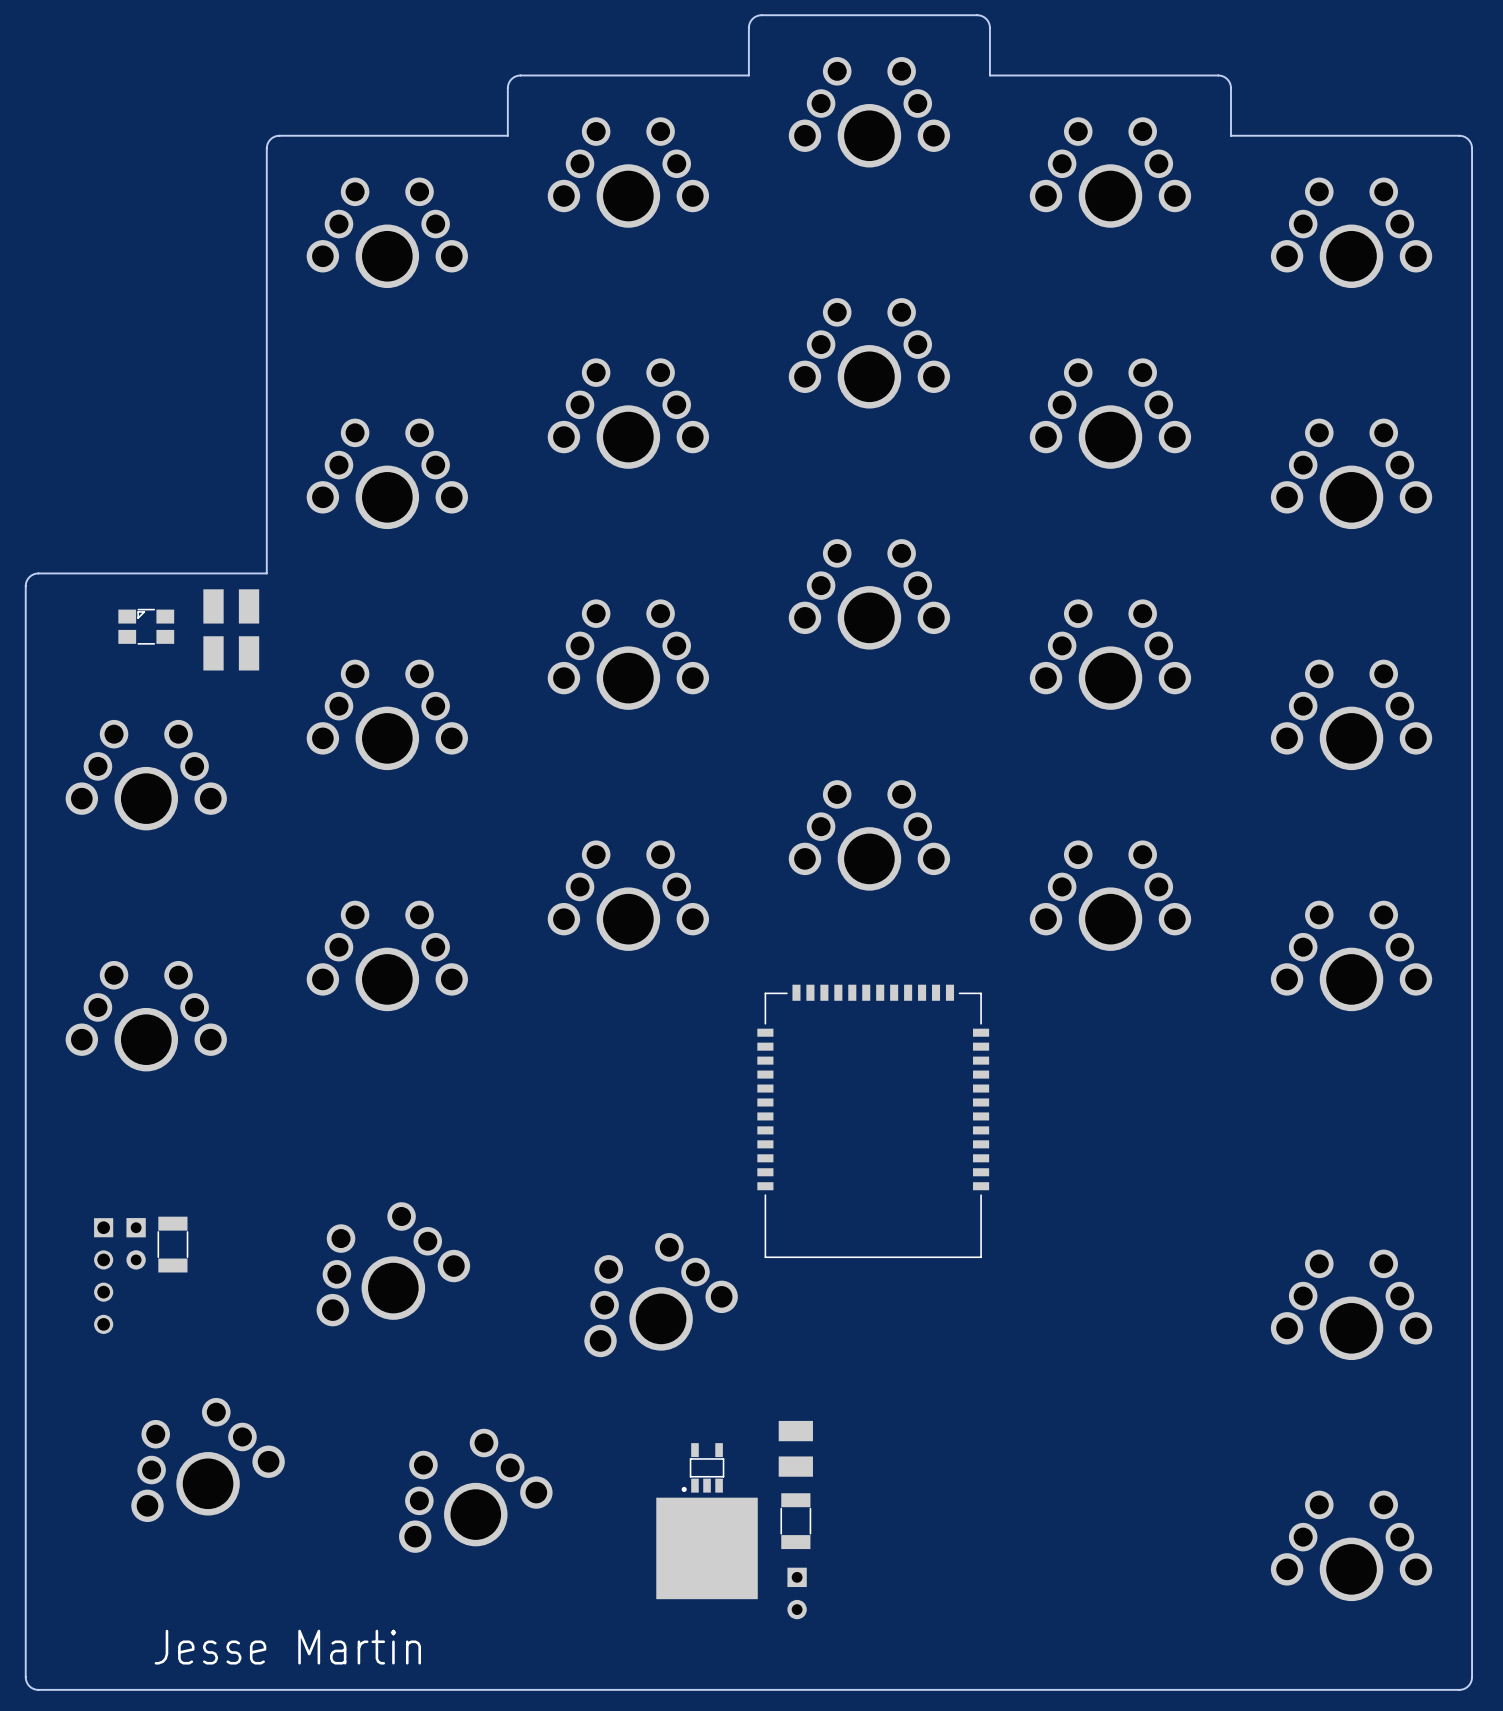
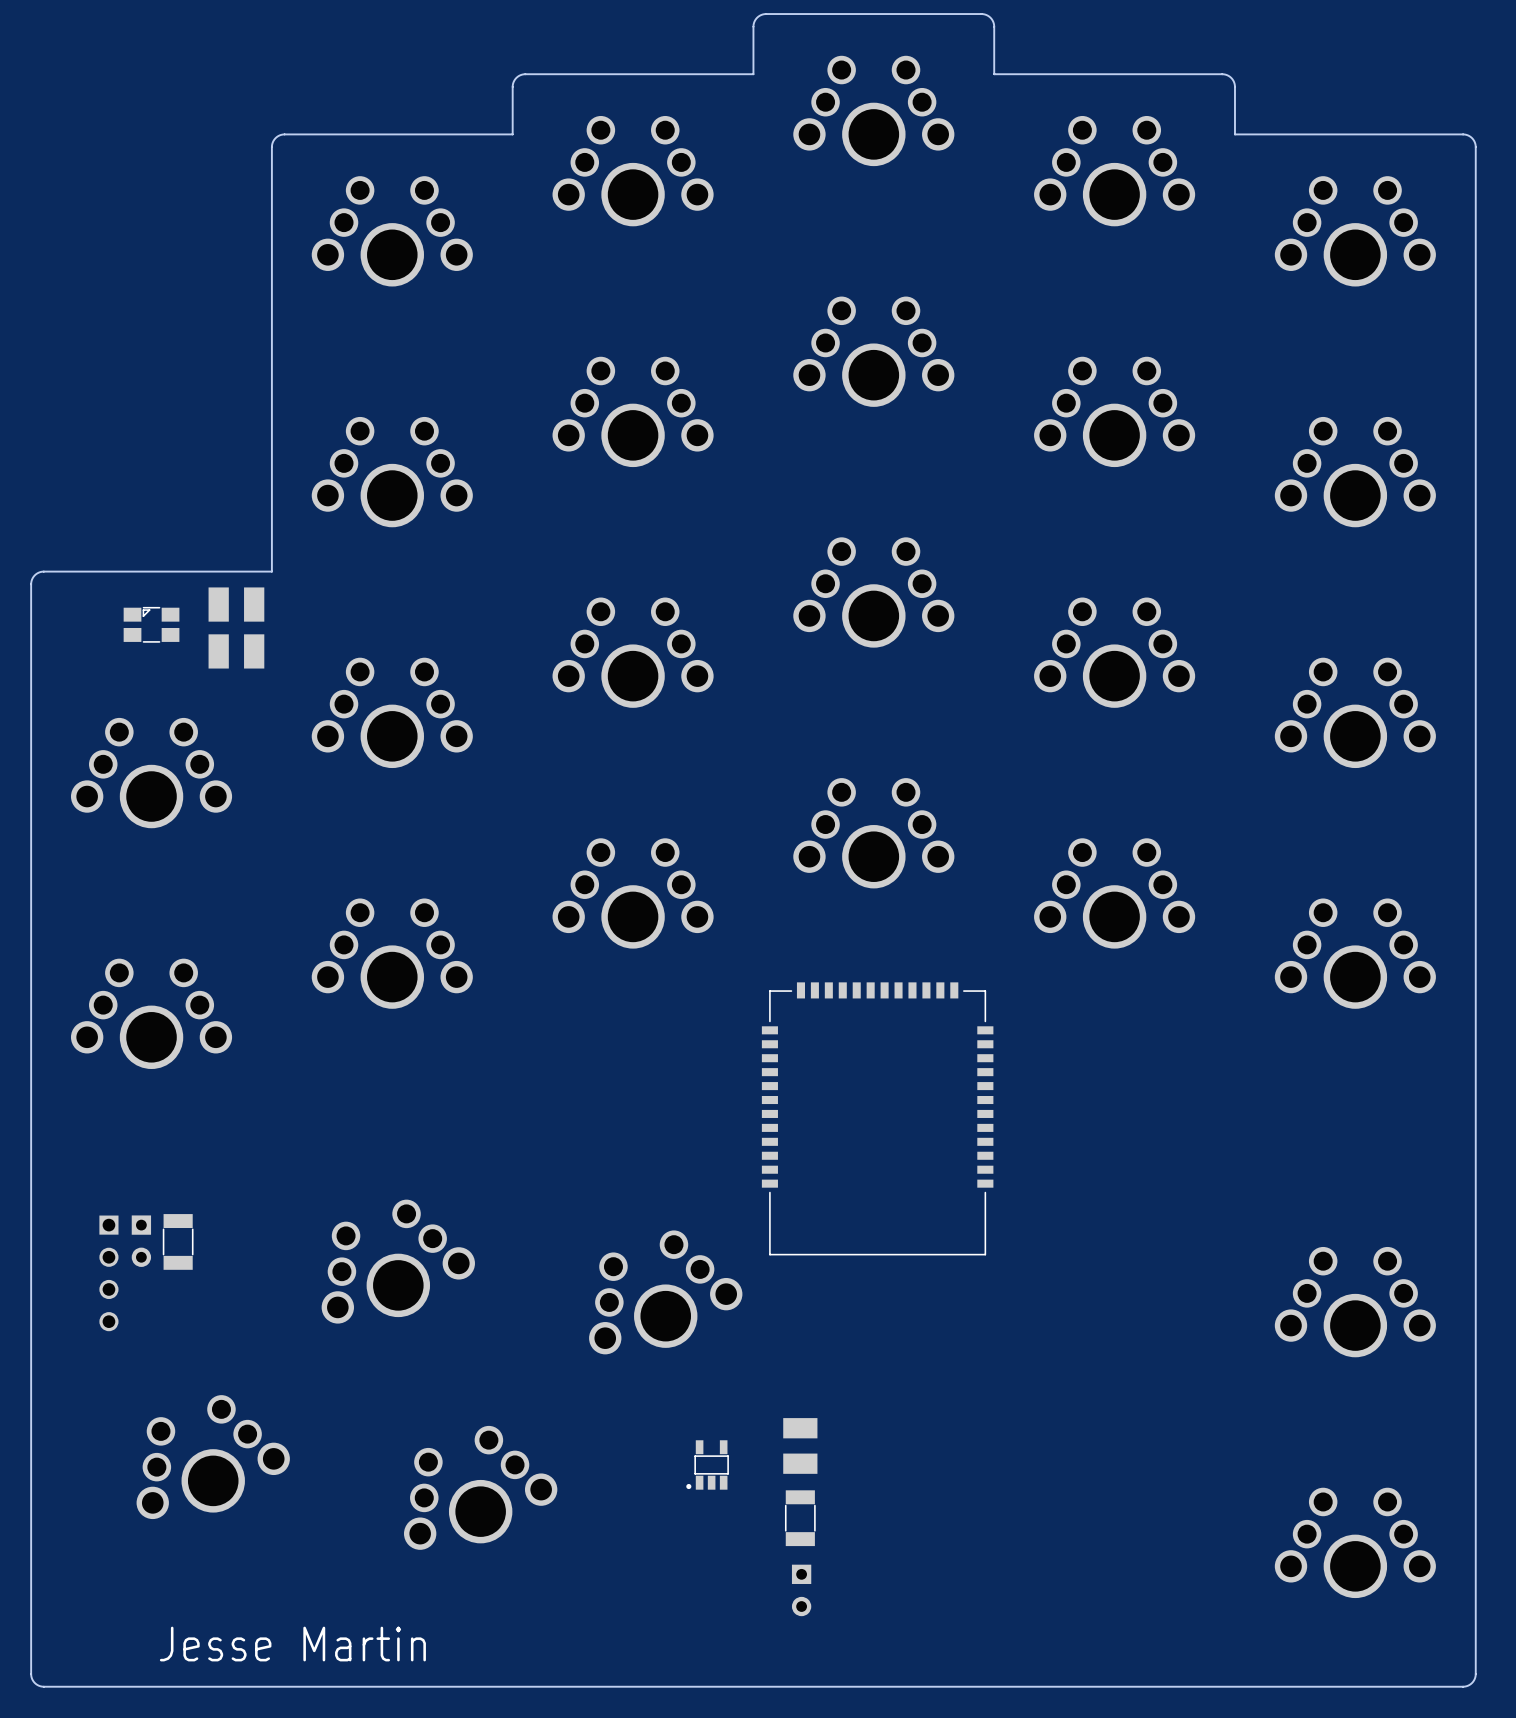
part: (707, 1521) -> none

